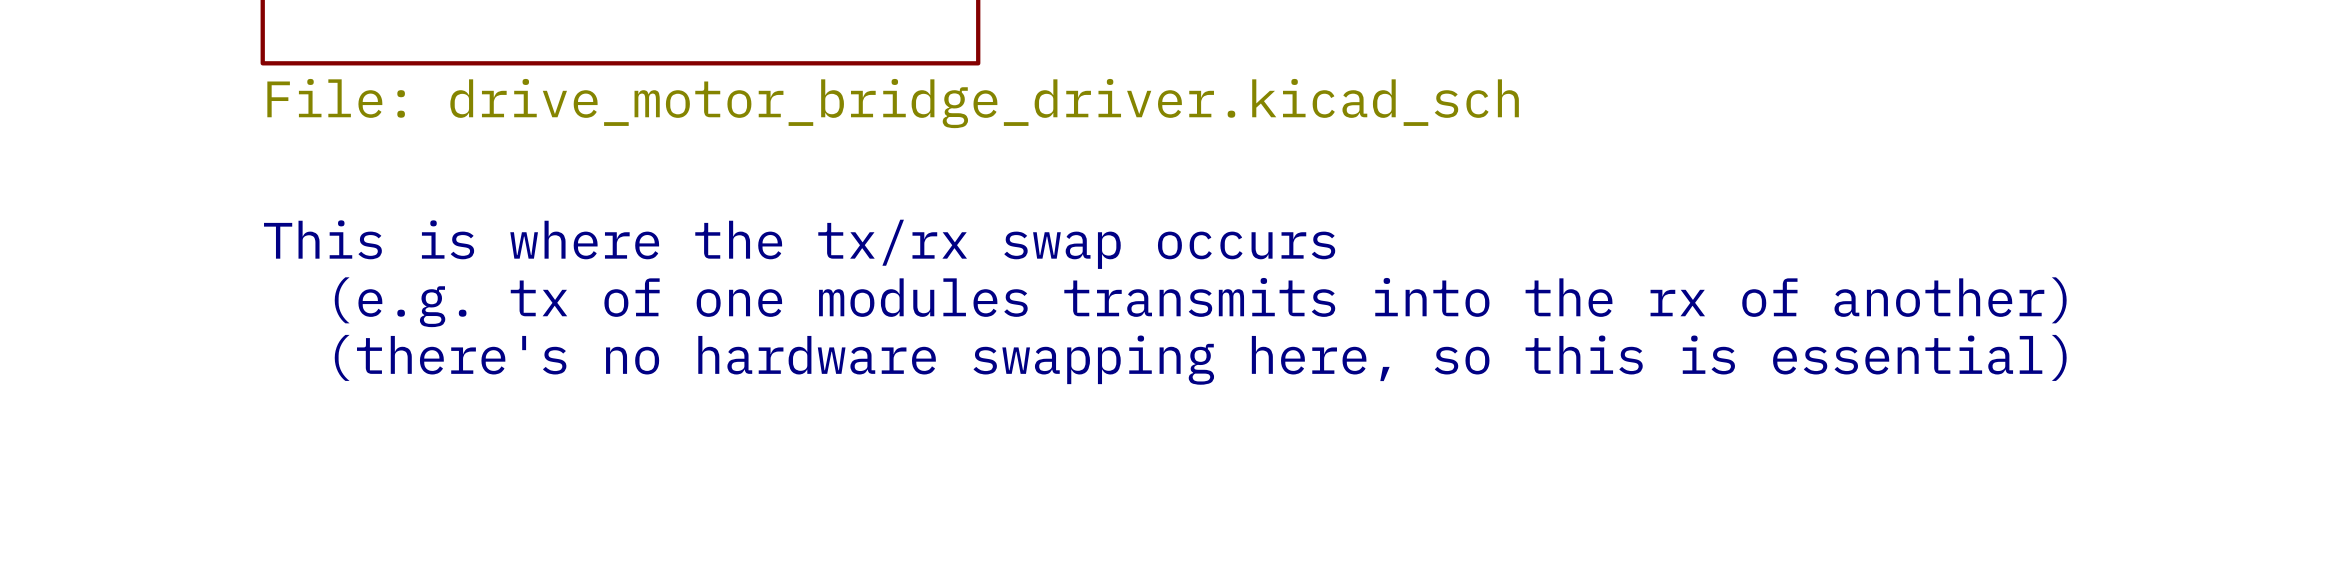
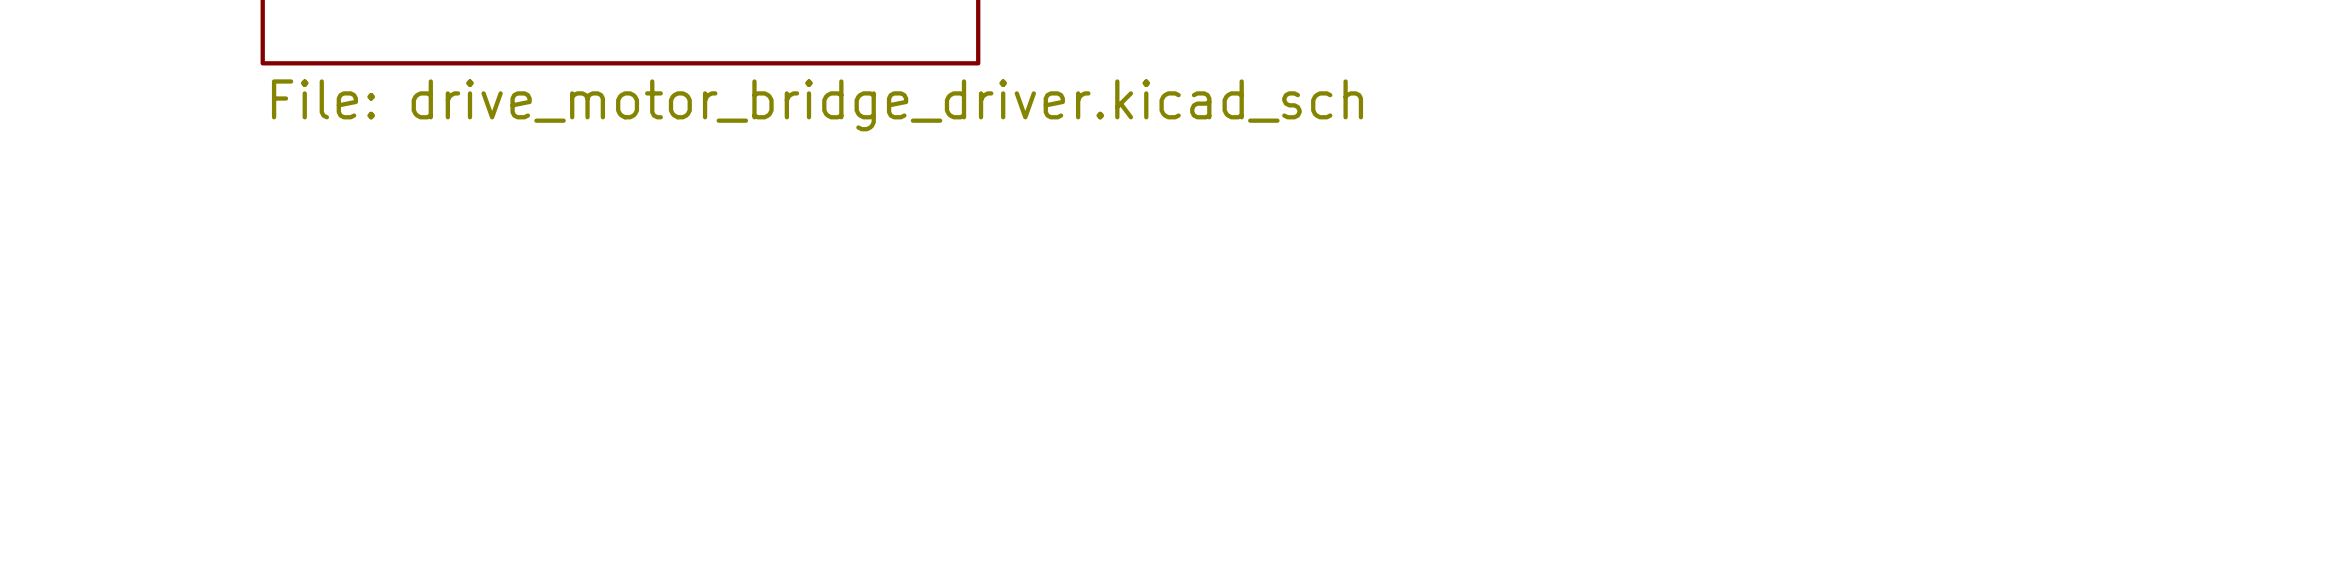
text: This is where the tx/rx swap occurs (799, 244) -> none
text: (e.g. tx of one modules transmits into the rx of another) (1200, 302) -> none
text: (there's no hardware swapping here, so this is essential) (1200, 359) -> none

